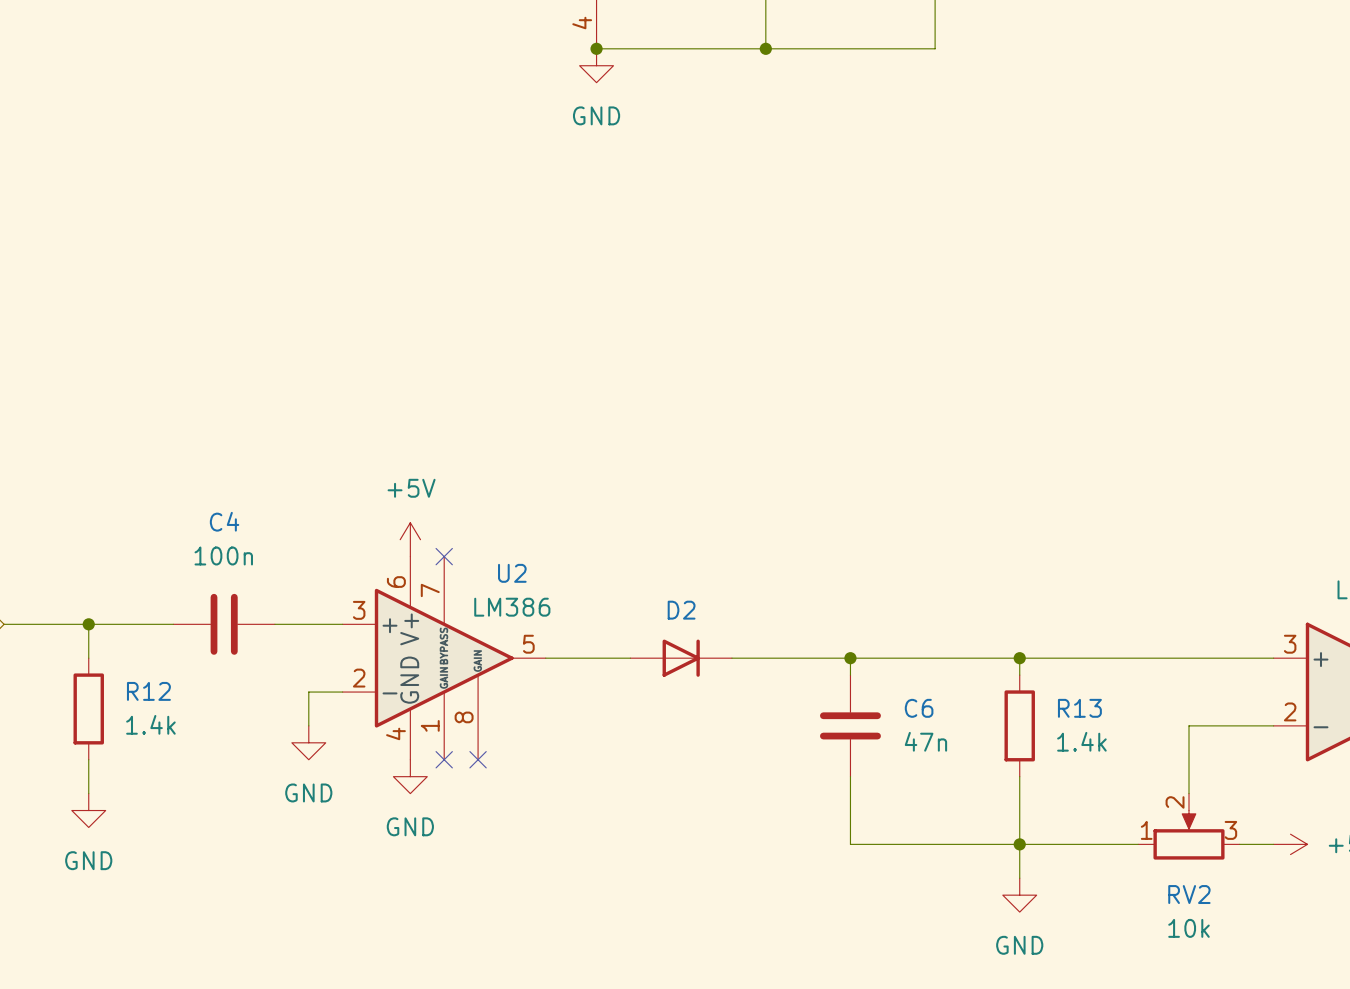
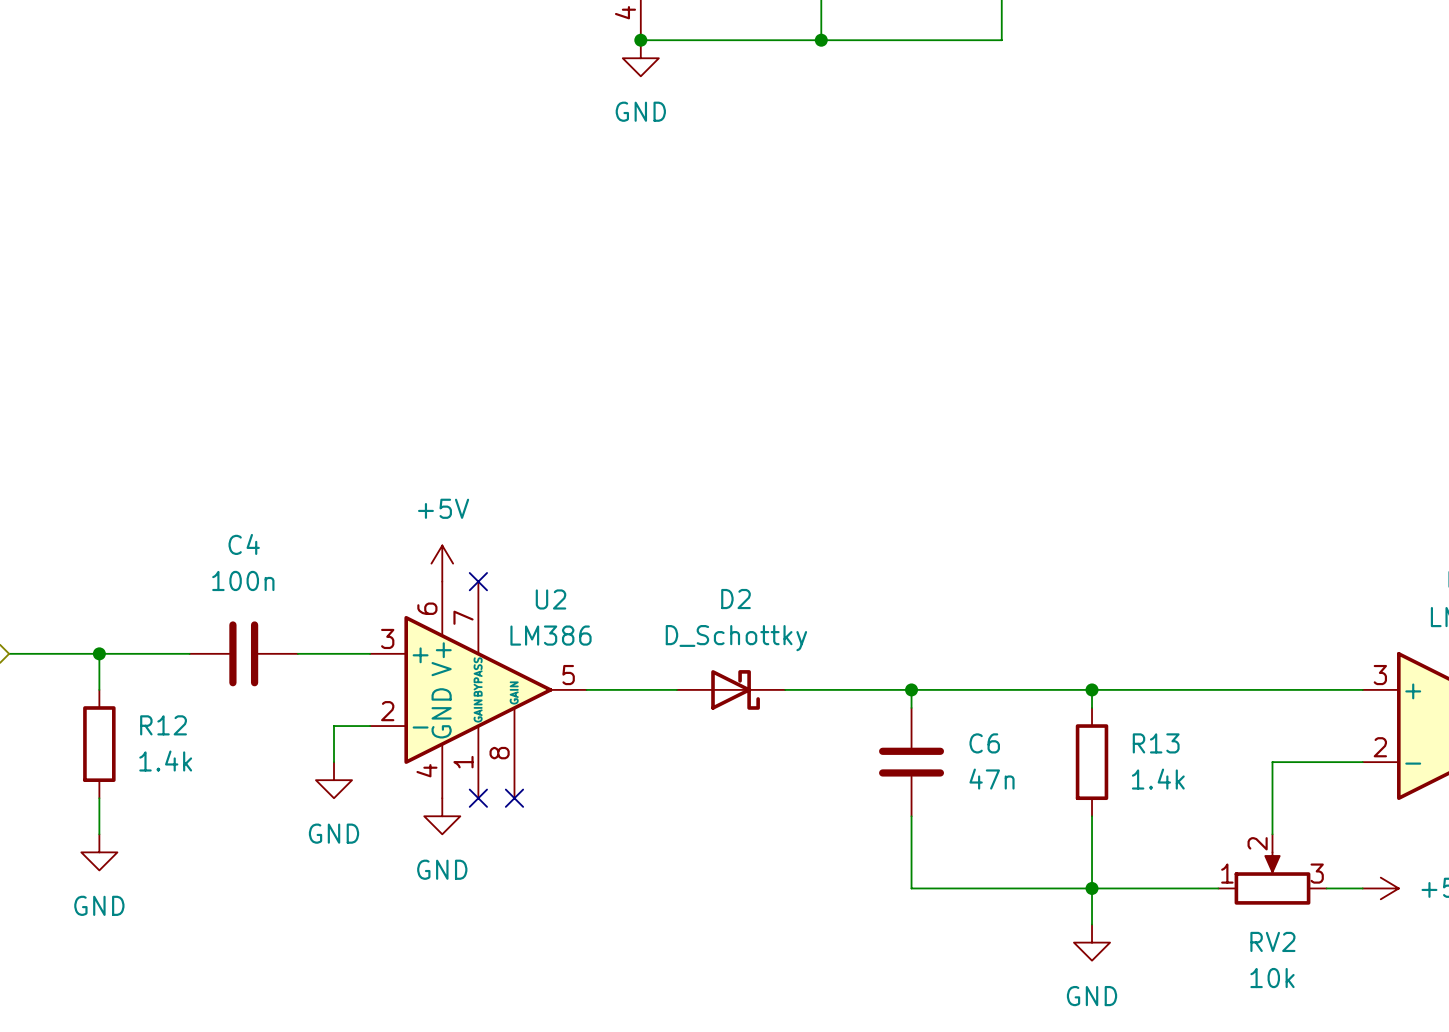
D2 value: none -> D_Schottky (736, 638)
D2 name position: D2 (681, 610) -> D2 (735, 599)
D2 symbol: [630, 639, 732, 677] -> [676, 670, 786, 710]

